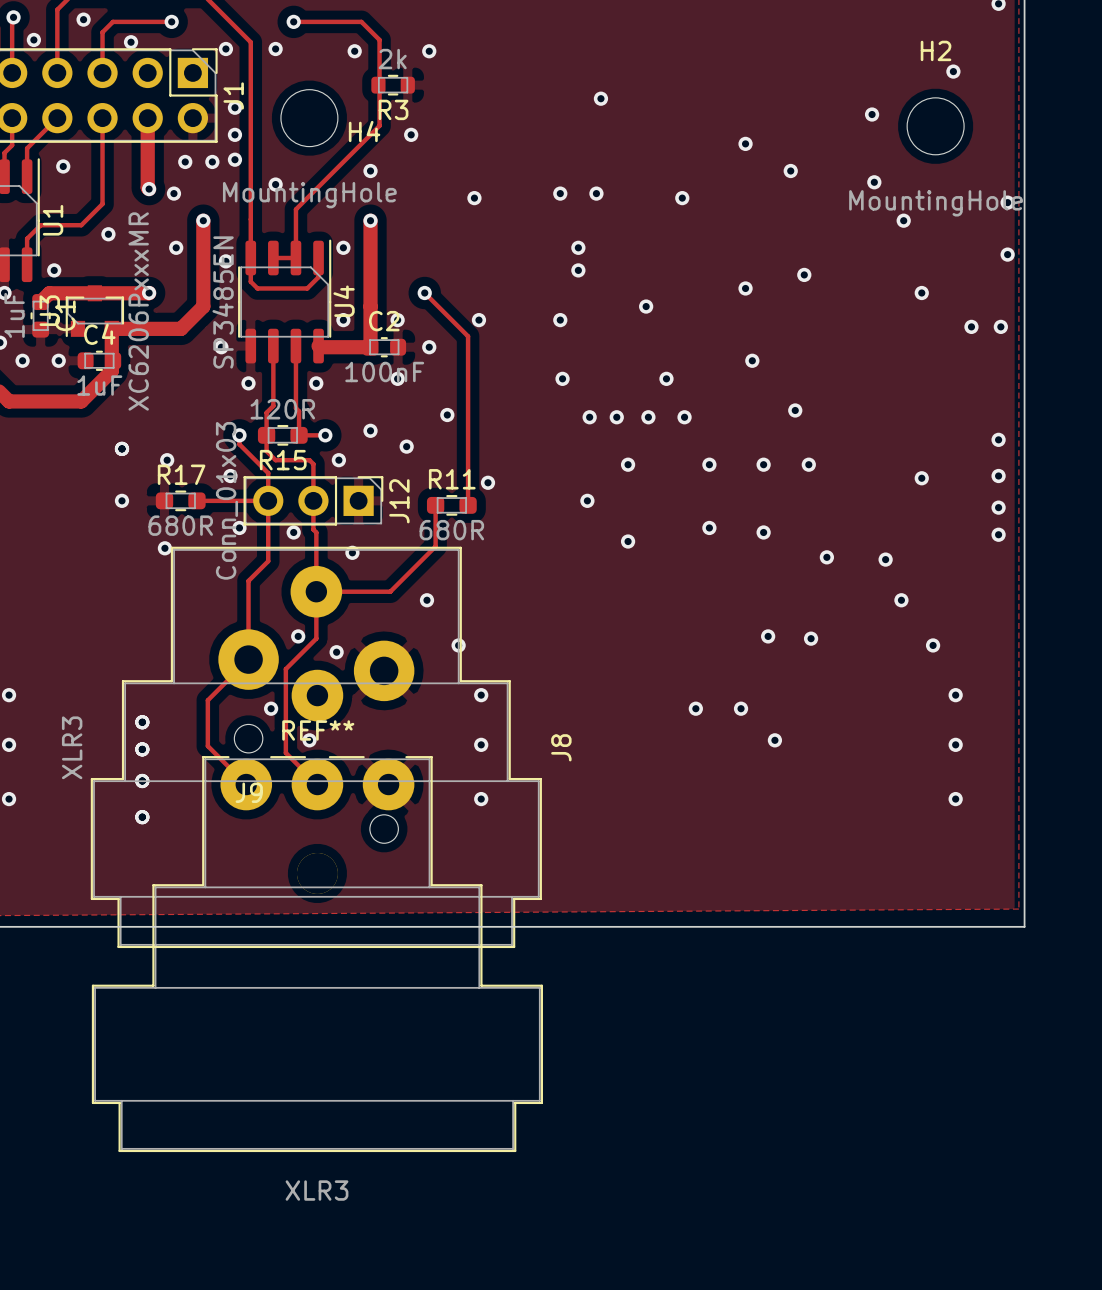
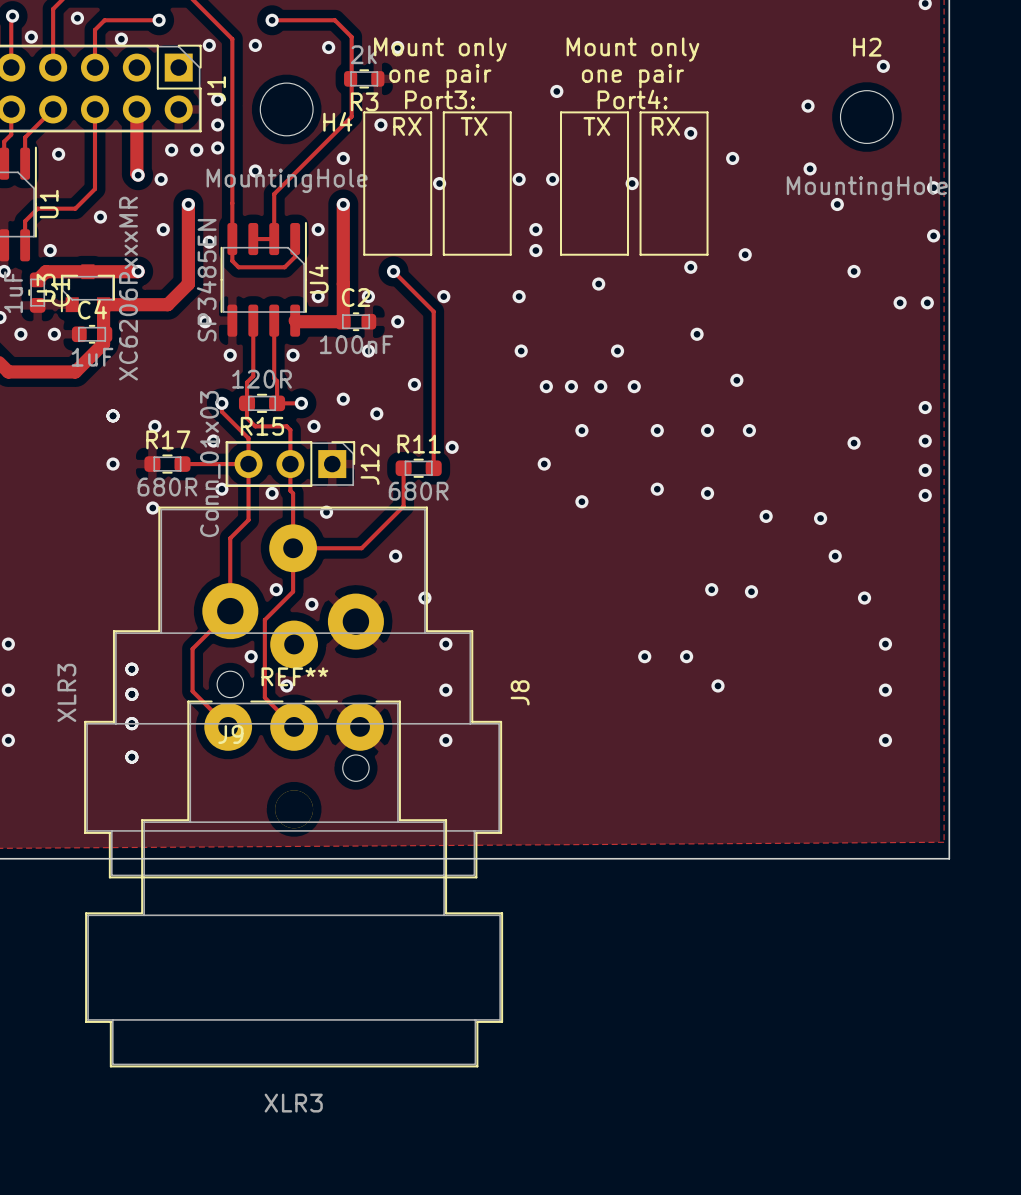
text: none -> Mount only (440, 49)
text: none -> Mount only (632, 49)
text: none -> one pair (440, 76)
text: none -> one pair (632, 76)
text: none -> Port3: (439, 99)
text: none -> Port4: (632, 99)
line: none -> (364, 112) (431, 112) (431, 254) (364, 254) (364, 112)
line: none -> (443, 112) (510, 112) (510, 254) (443, 254) (443, 112)
line: none -> (561, 112) (627, 112) (627, 254) (561, 254) (561, 112)
line: none -> (640, 112) (707, 112) (707, 254) (640, 254) (640, 112)
text: none -> RX TX (440, 126)
text: none -> TX RX (631, 126)

